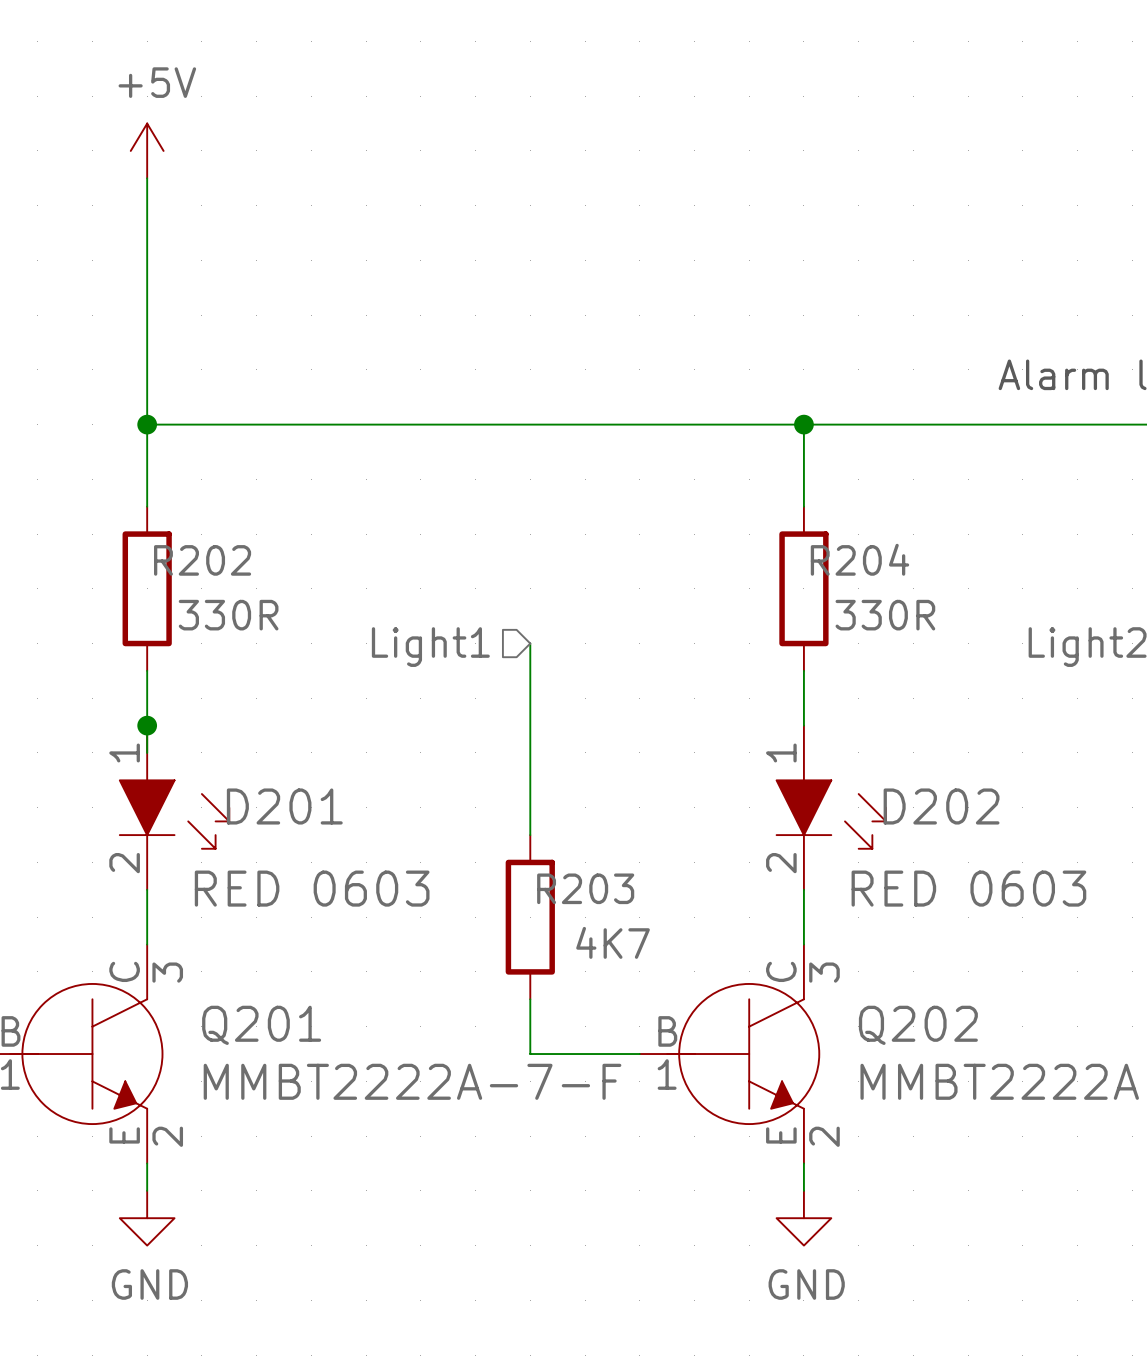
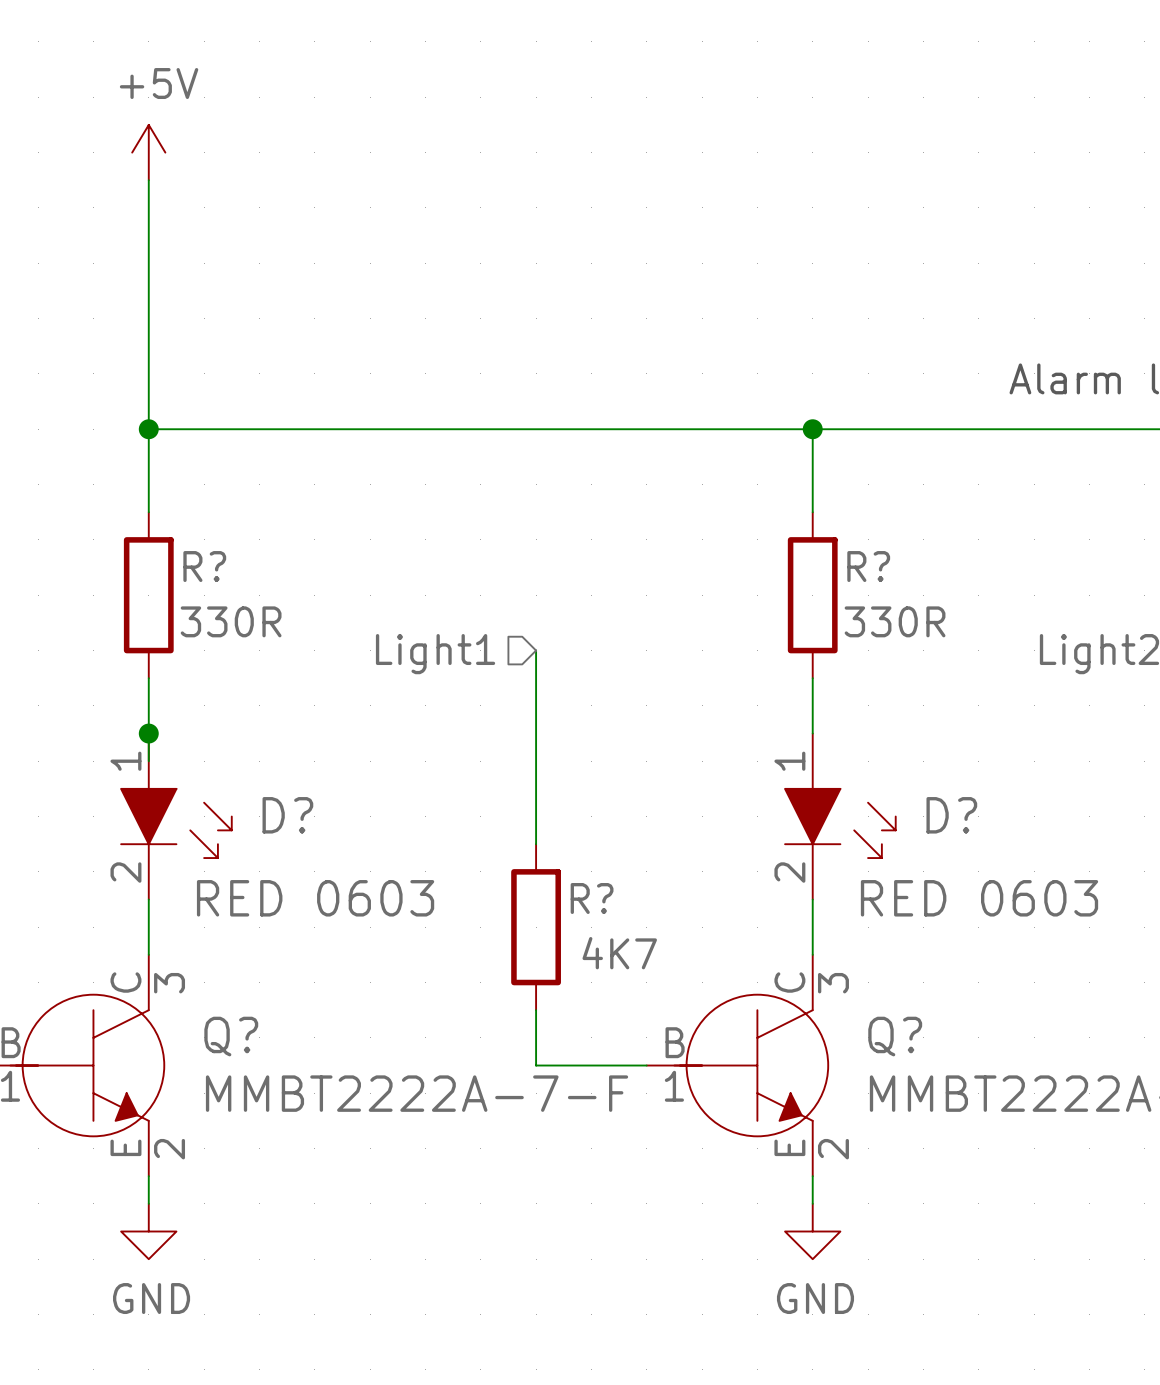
R204 name: R204 (859, 559) -> R? (868, 566)
R202 name: R202 (202, 560) -> R? (204, 566)
D201 name: D201 (284, 806) -> D? (287, 815)
D202 name: D202 (941, 806) -> D? (951, 815)
R203 name: R203 (585, 888) -> R? (592, 898)
Q201 name: Q201 (261, 1025) -> Q? (231, 1036)
Q202 name: Q202 (918, 1025) -> Q? (895, 1036)

